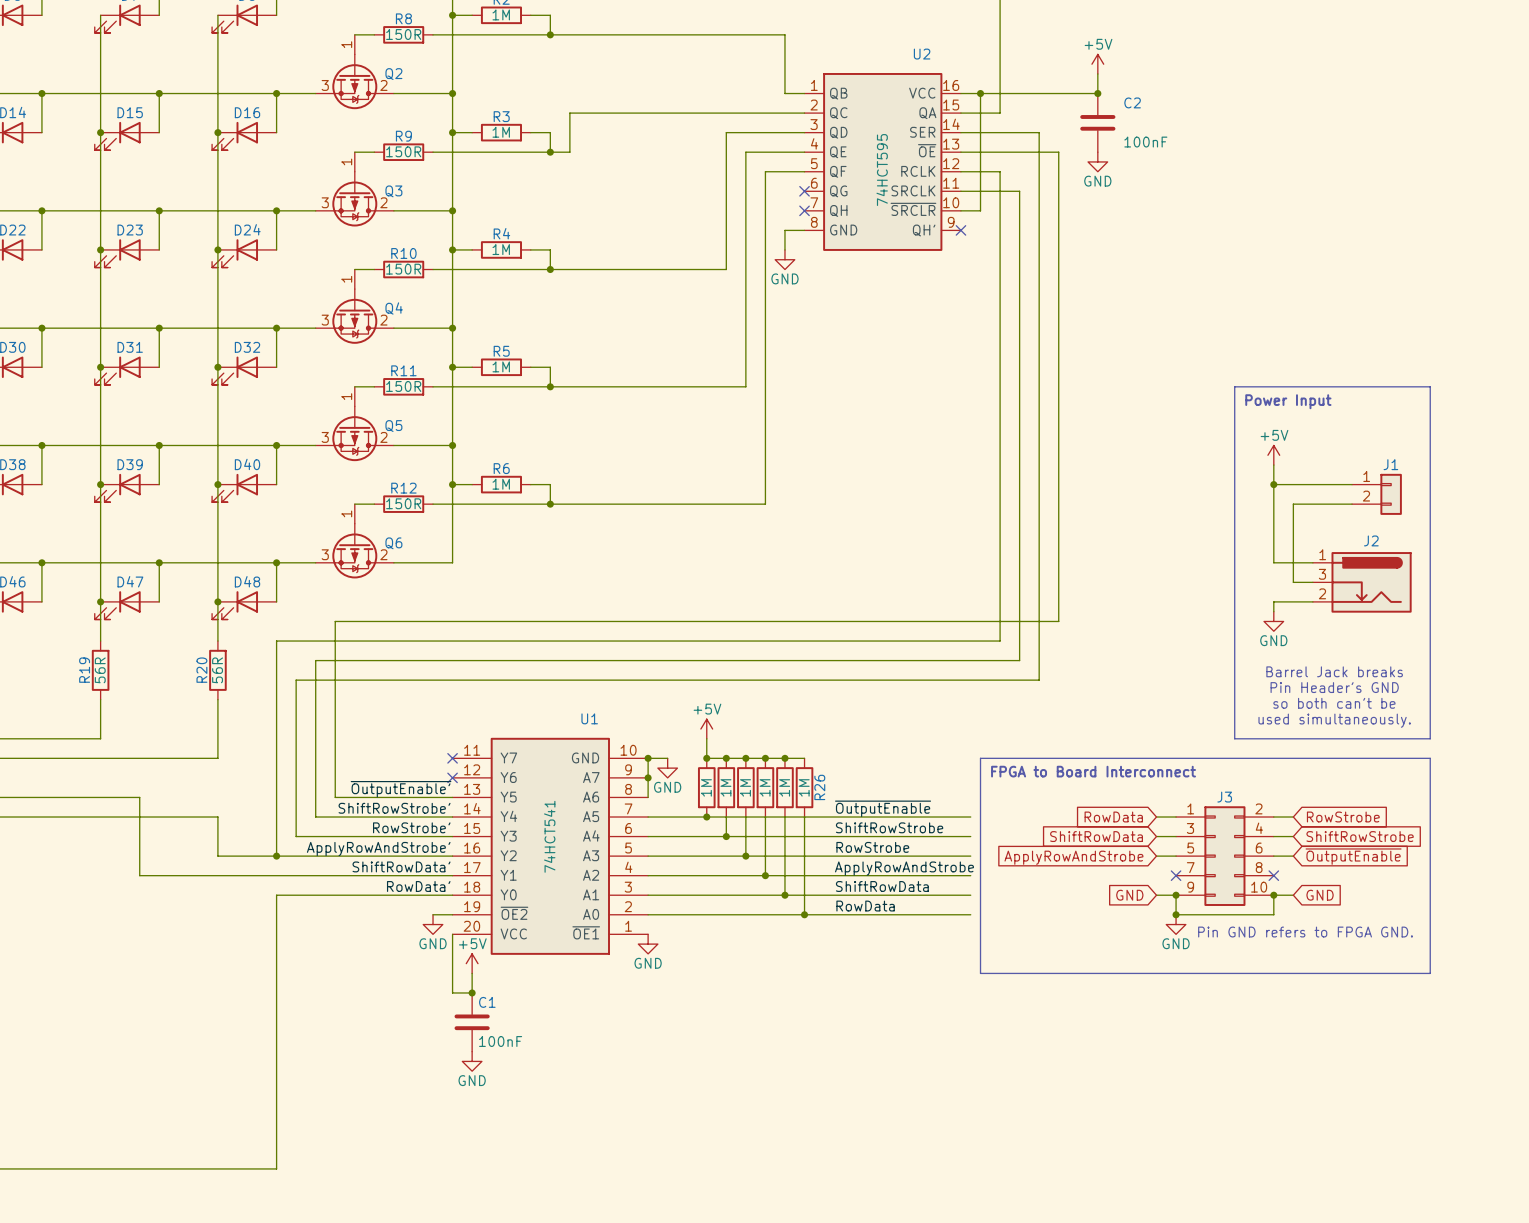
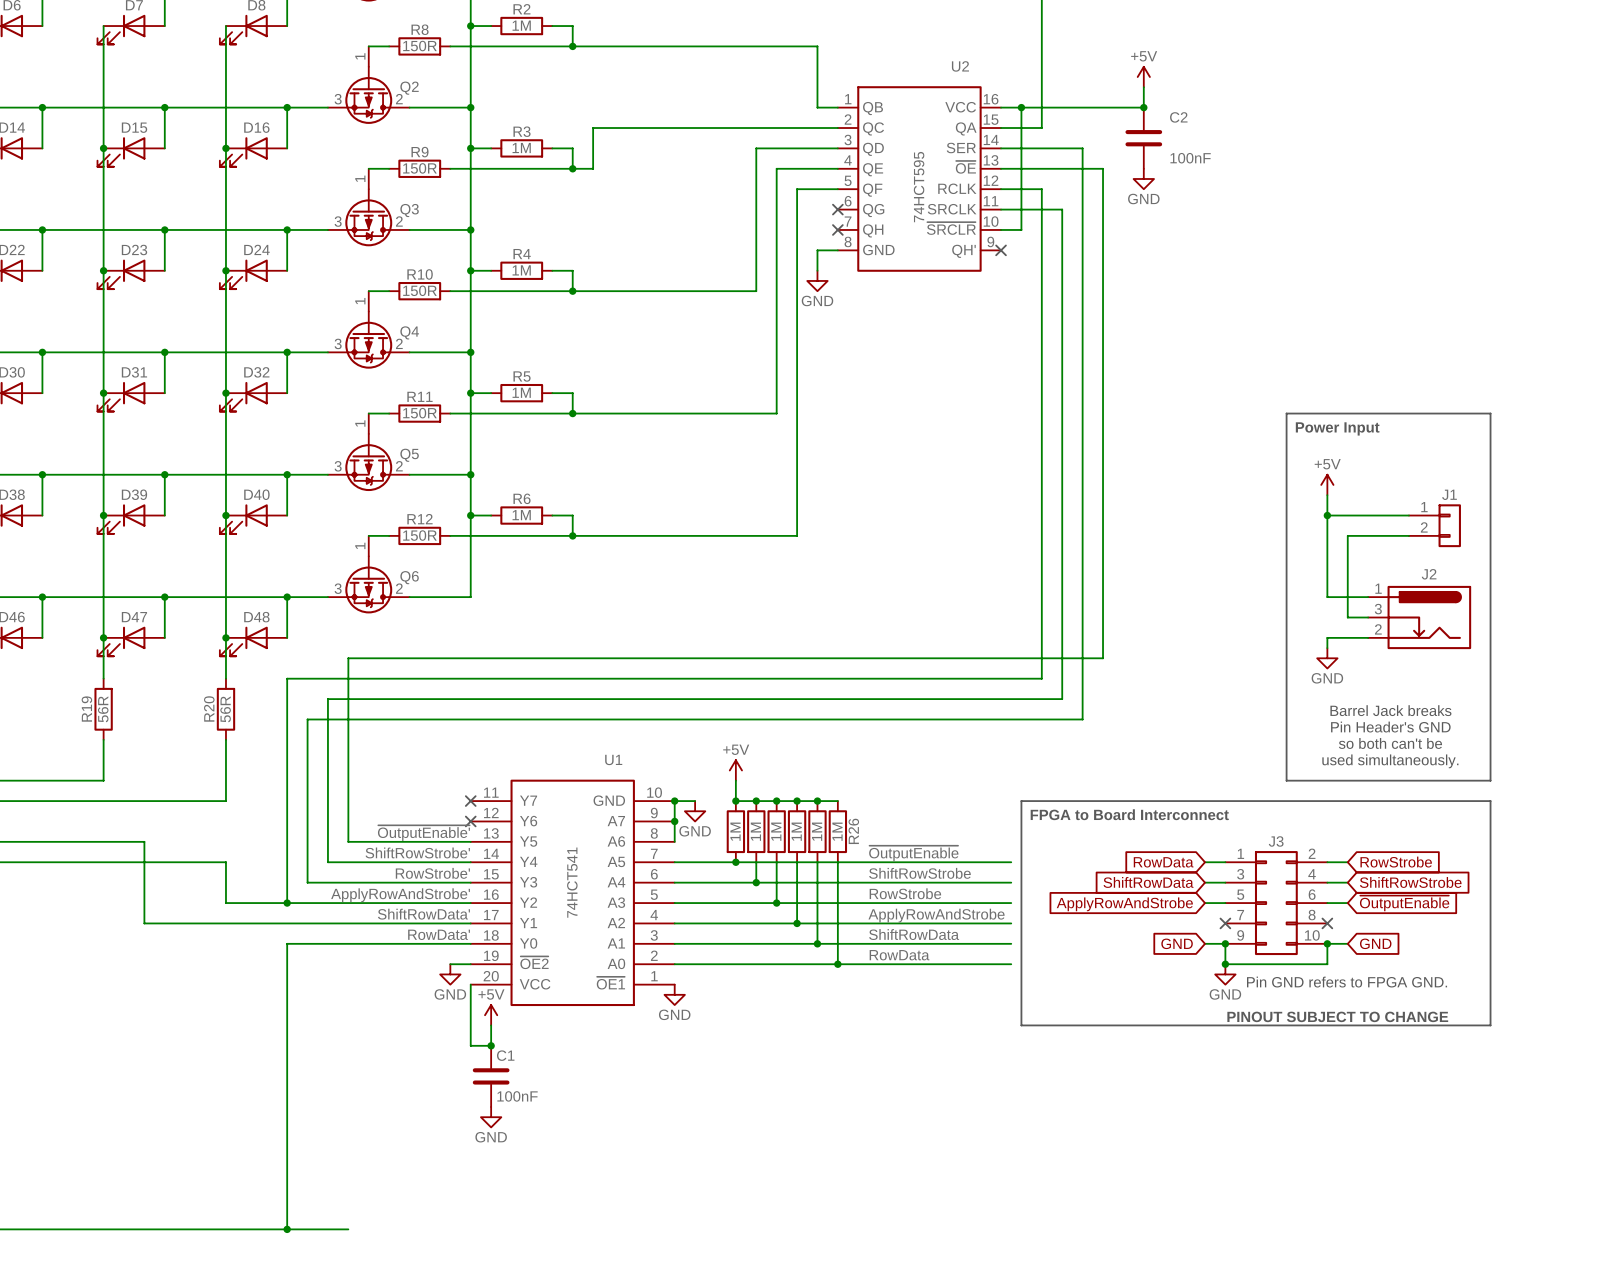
text: none -> PINOUT SUBJECT TO CHANGE (1337, 1016)
wire: none -> (287, 1229) (348, 1229)
junction: none -> (287, 1229)

